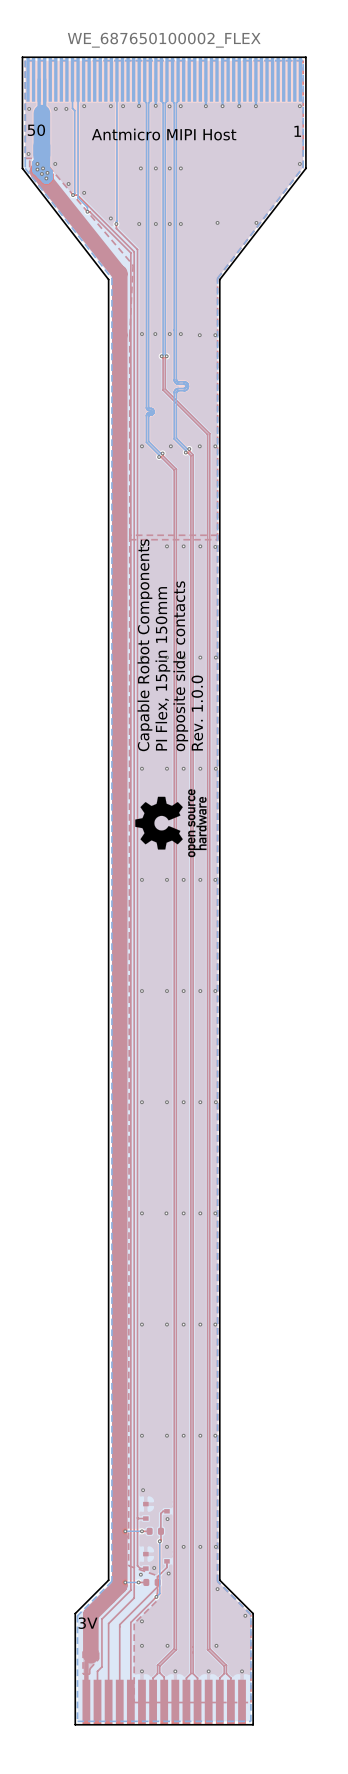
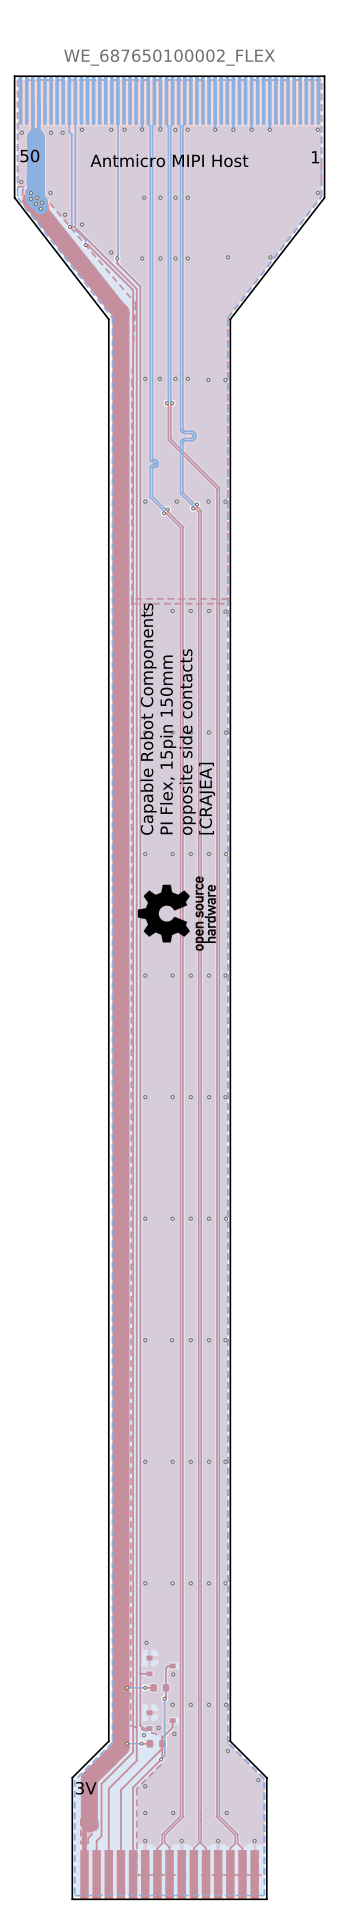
text: Rev. 1.0.0 (197, 713) -> [CRAJEA] (207, 798)

